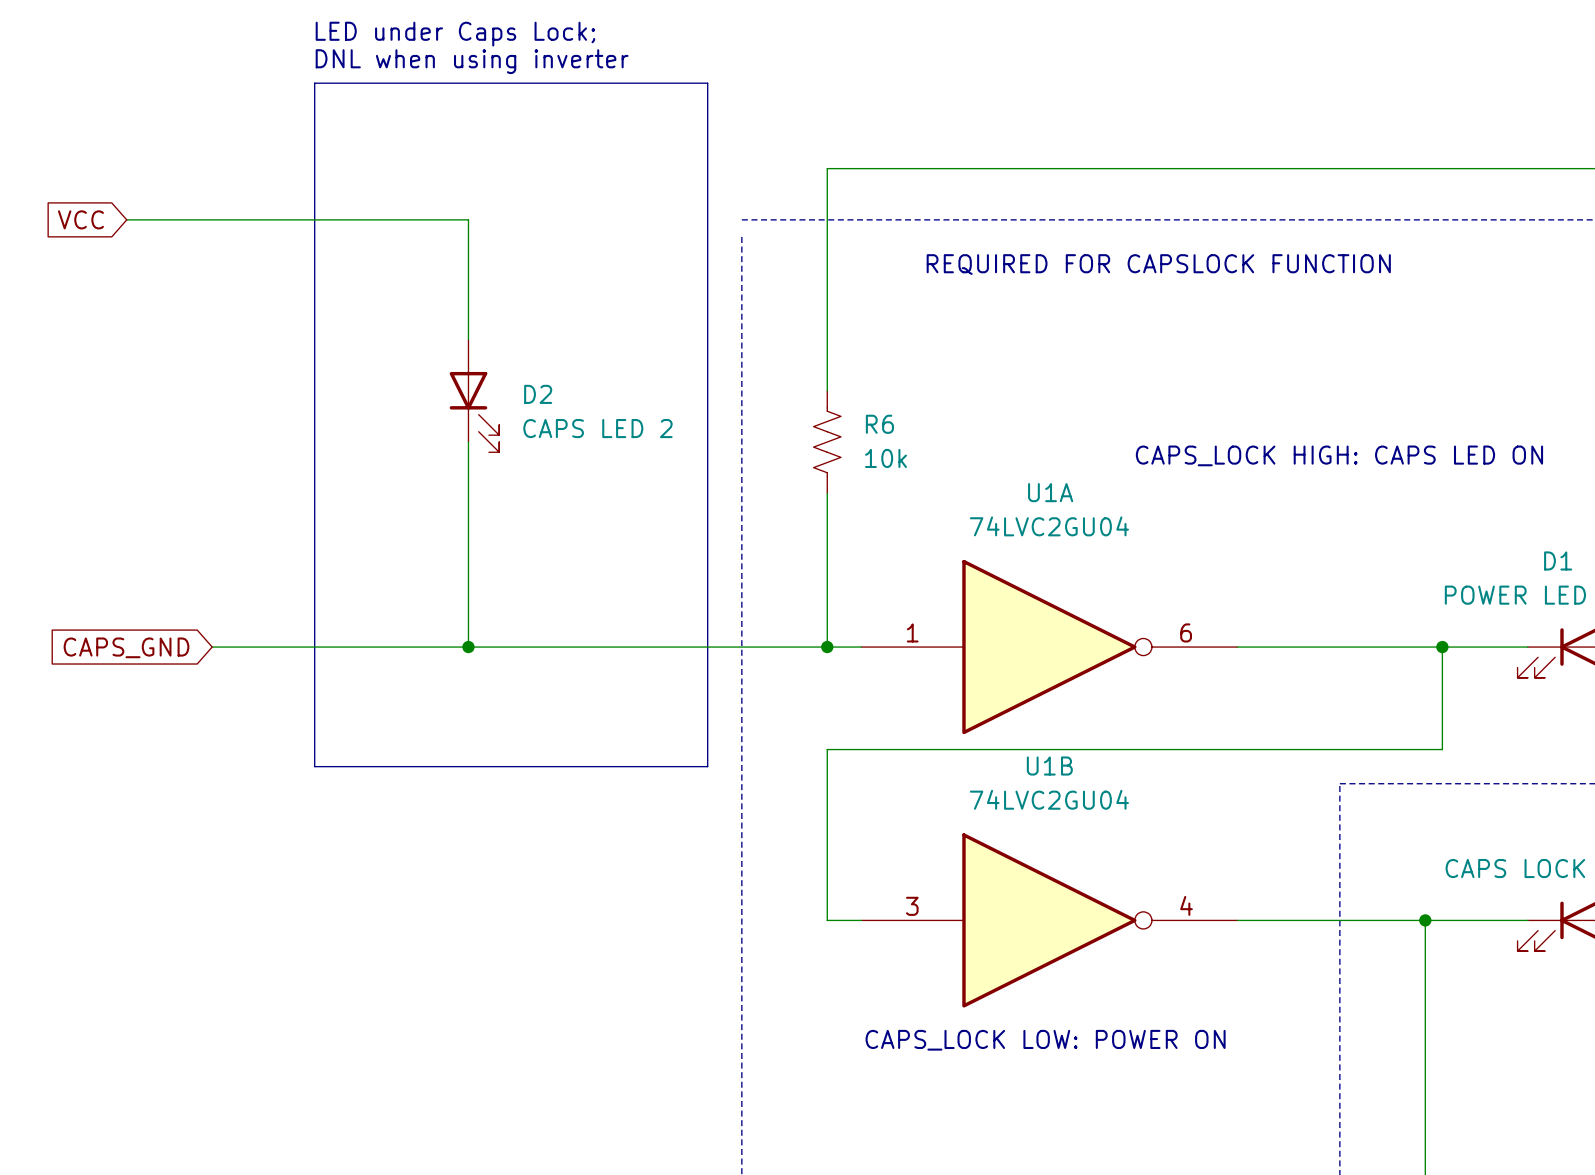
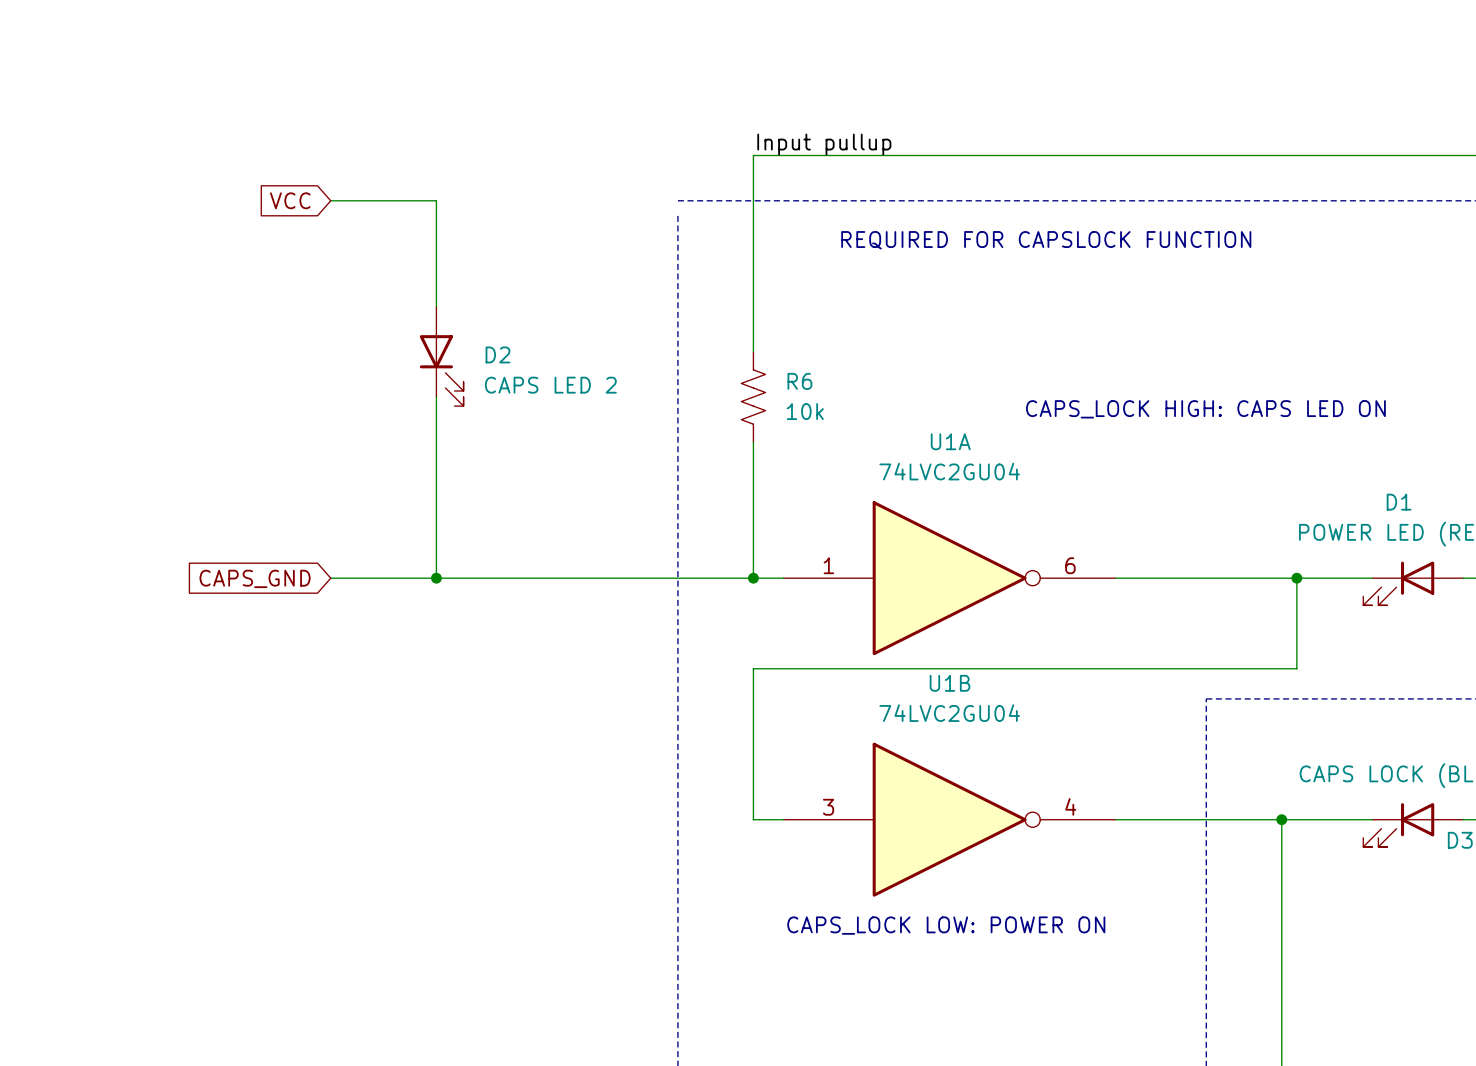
text: LED under Caps Lock; (455, 34) -> none
text: DNL when using inverter (472, 61) -> none
line: (314, 83) (707, 83) (707, 766) (314, 766) (314, 83) -> none
label: none -> Input pullup (824, 144)
global label position: VCC (80, 219) -> VCC (290, 200)
wire: (126, 219) (348, 219) -> none
global label position: CAPS_GND (126, 647) -> CAPS_GND (255, 578)
wire: (212, 647) (348, 647) -> none

